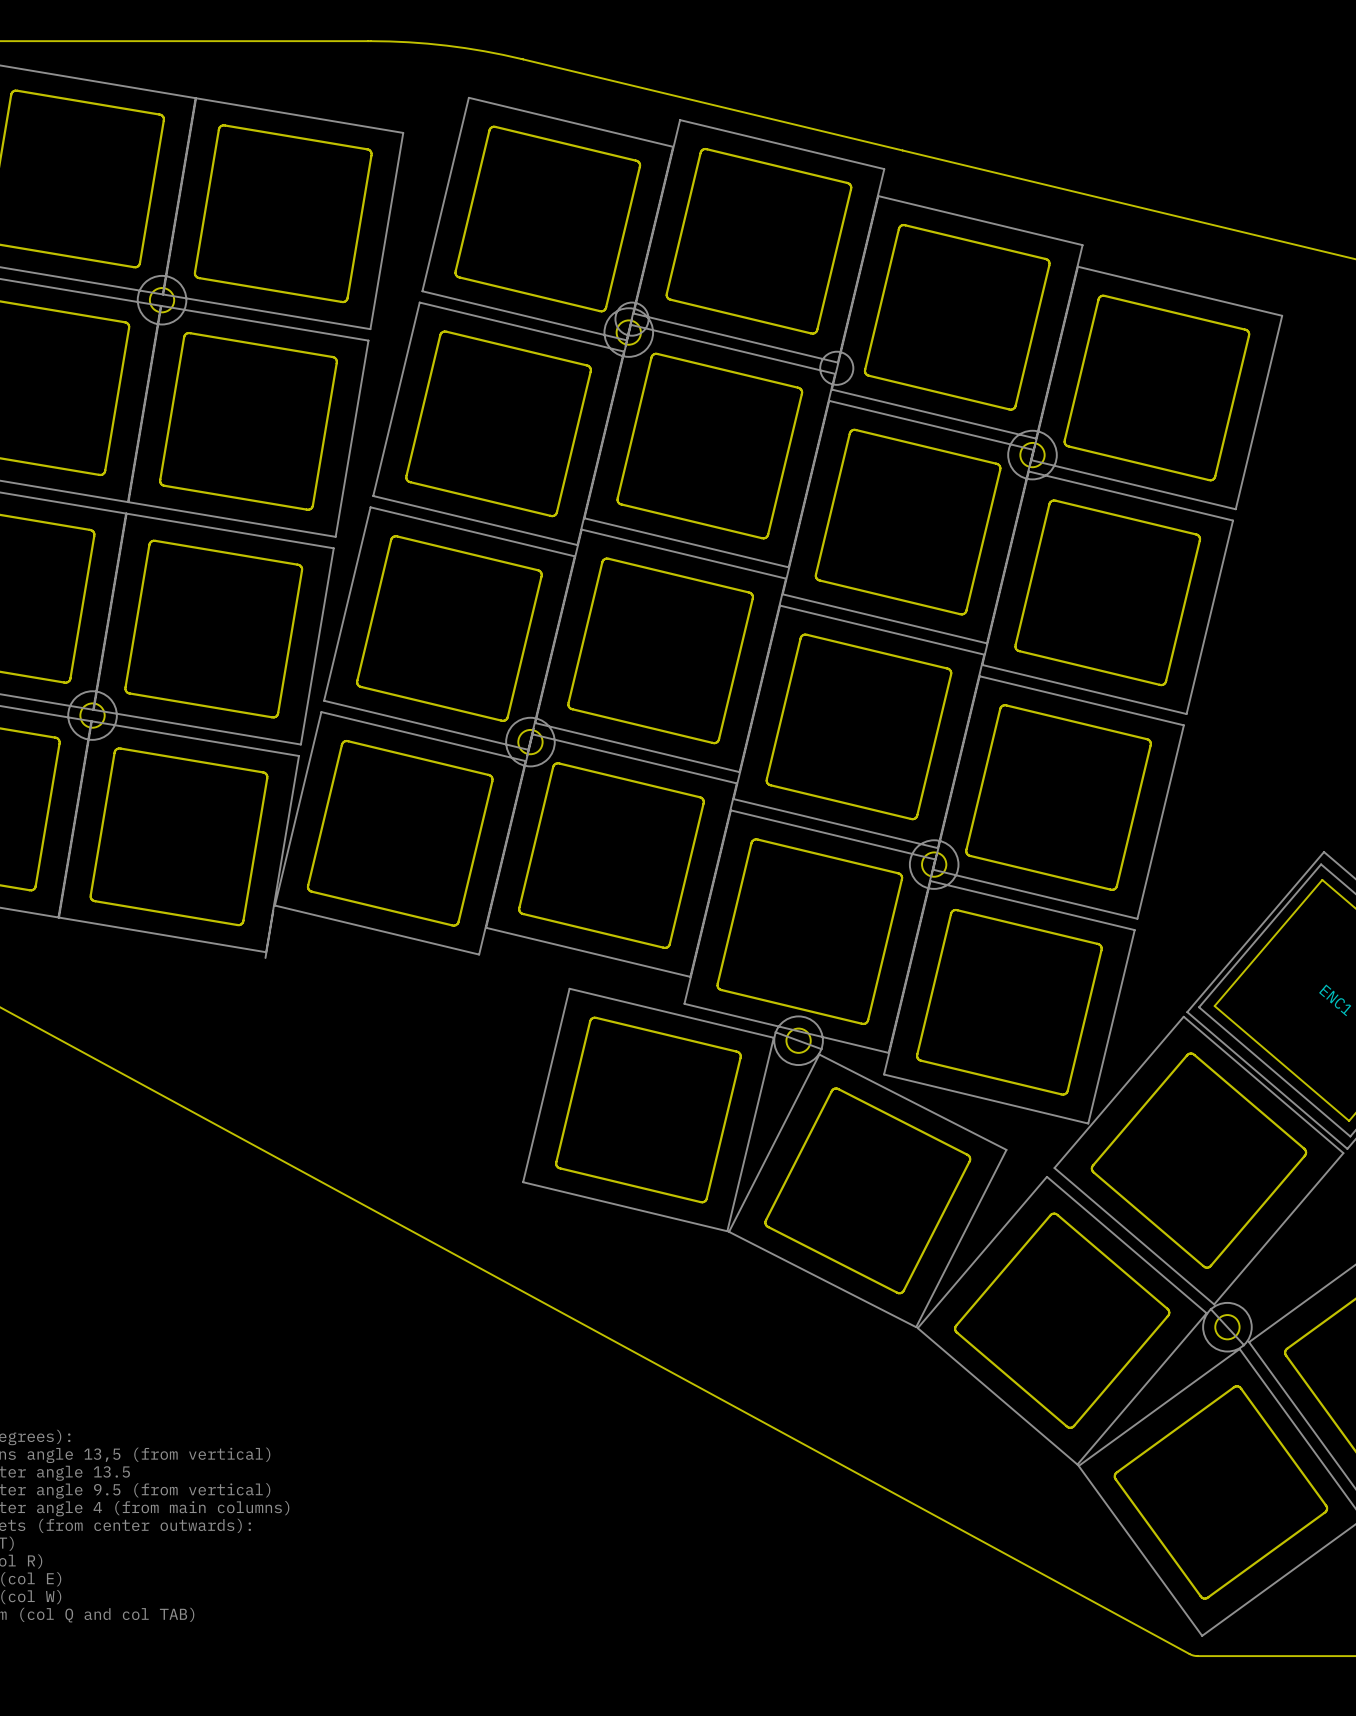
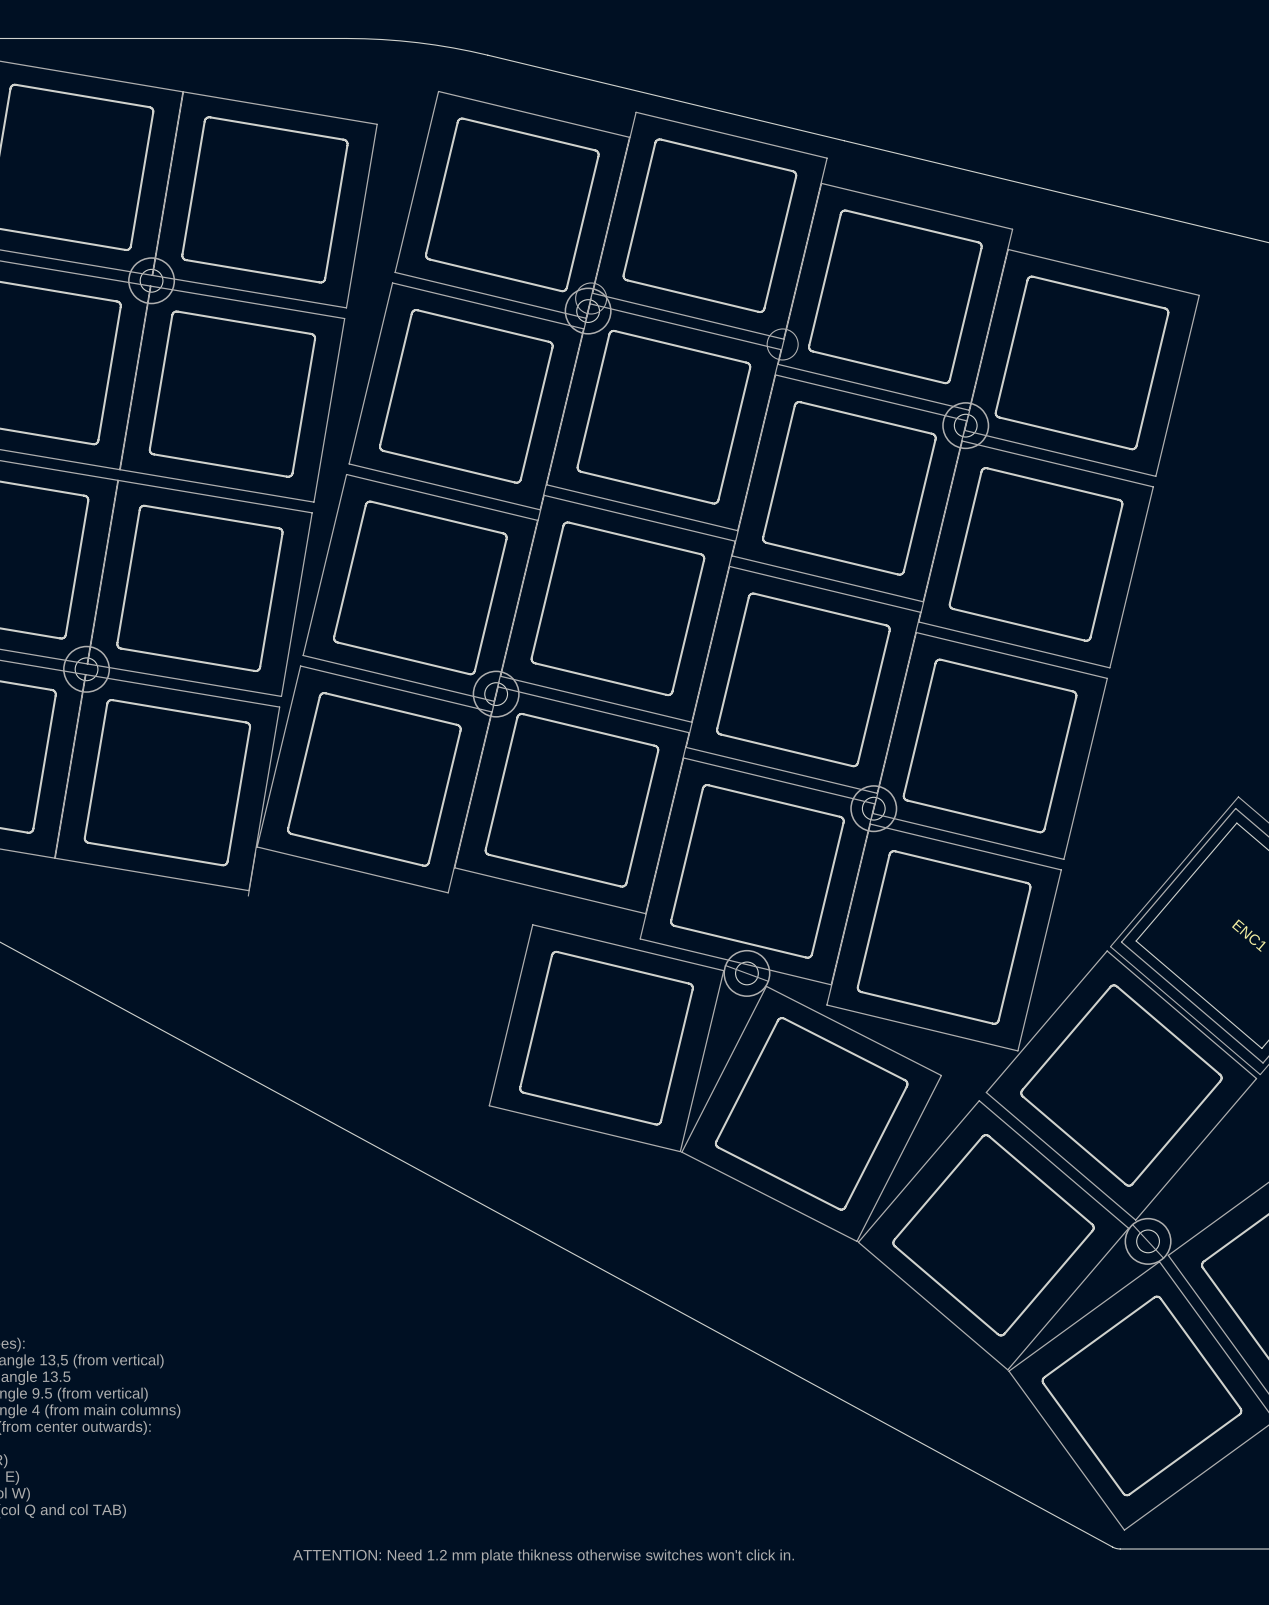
text: none -> ATTENTION: Need 1.2 mm plate thikness otherwise switches won't click in. (543, 1556)

